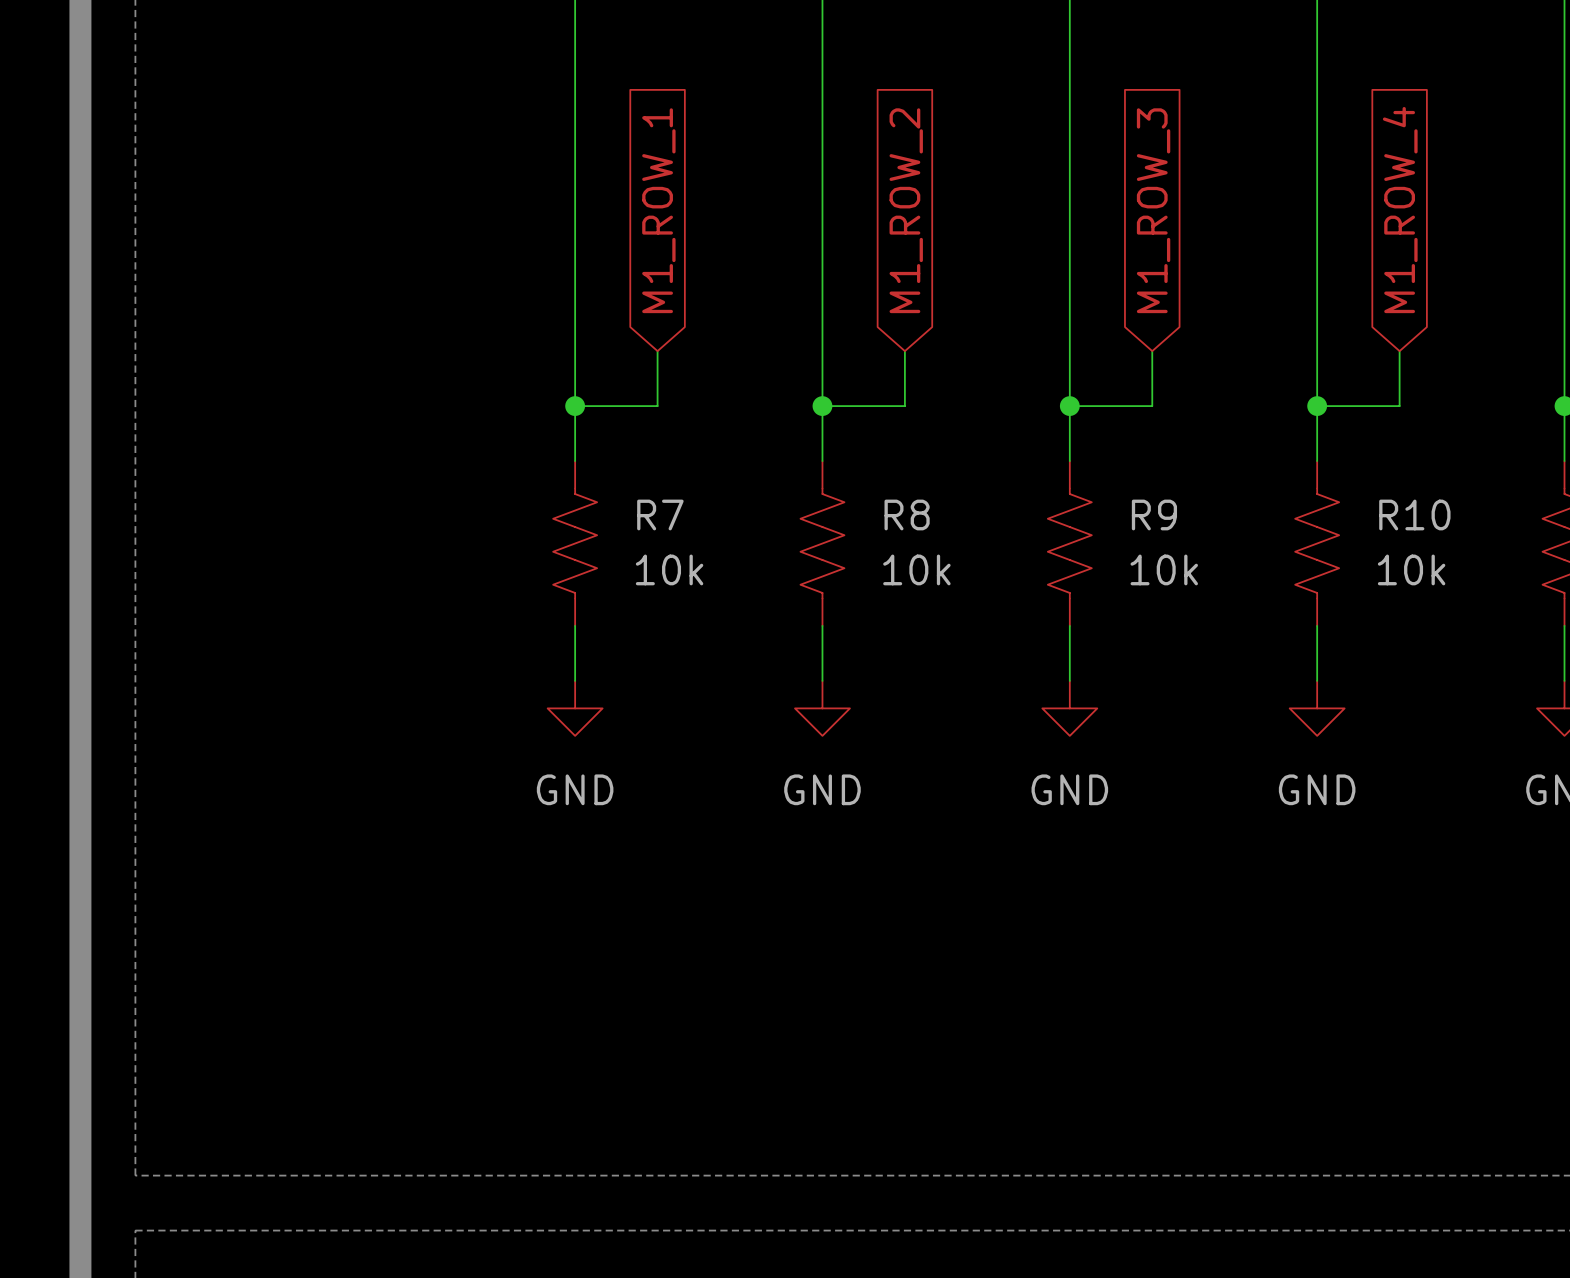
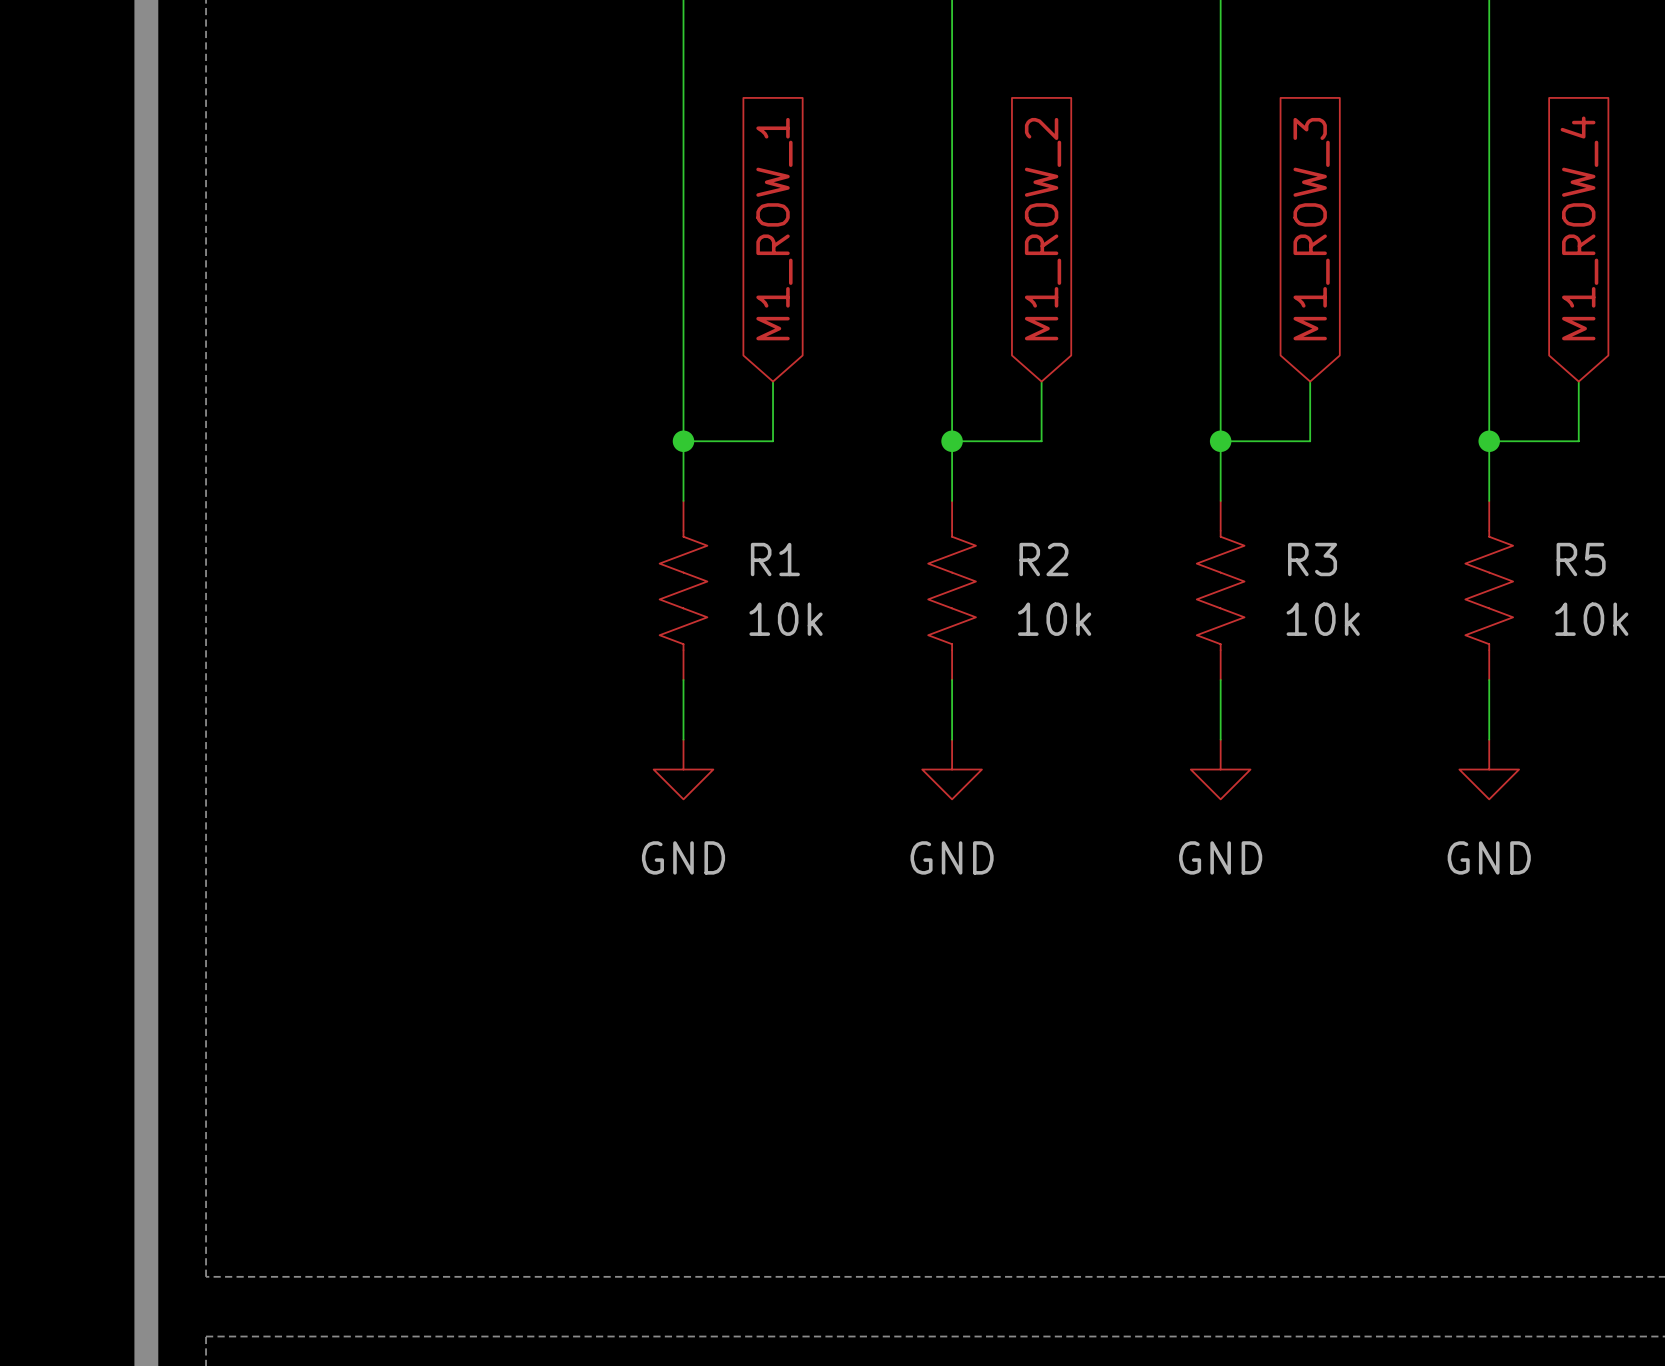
R7 name: R7 (660, 514) -> R1 (775, 559)
R8 name: R8 (907, 514) -> R2 (1043, 559)
R9 name: R9 (1154, 514) -> R3 (1312, 559)
R10 name: R10 (1414, 514) -> R5 (1581, 559)

